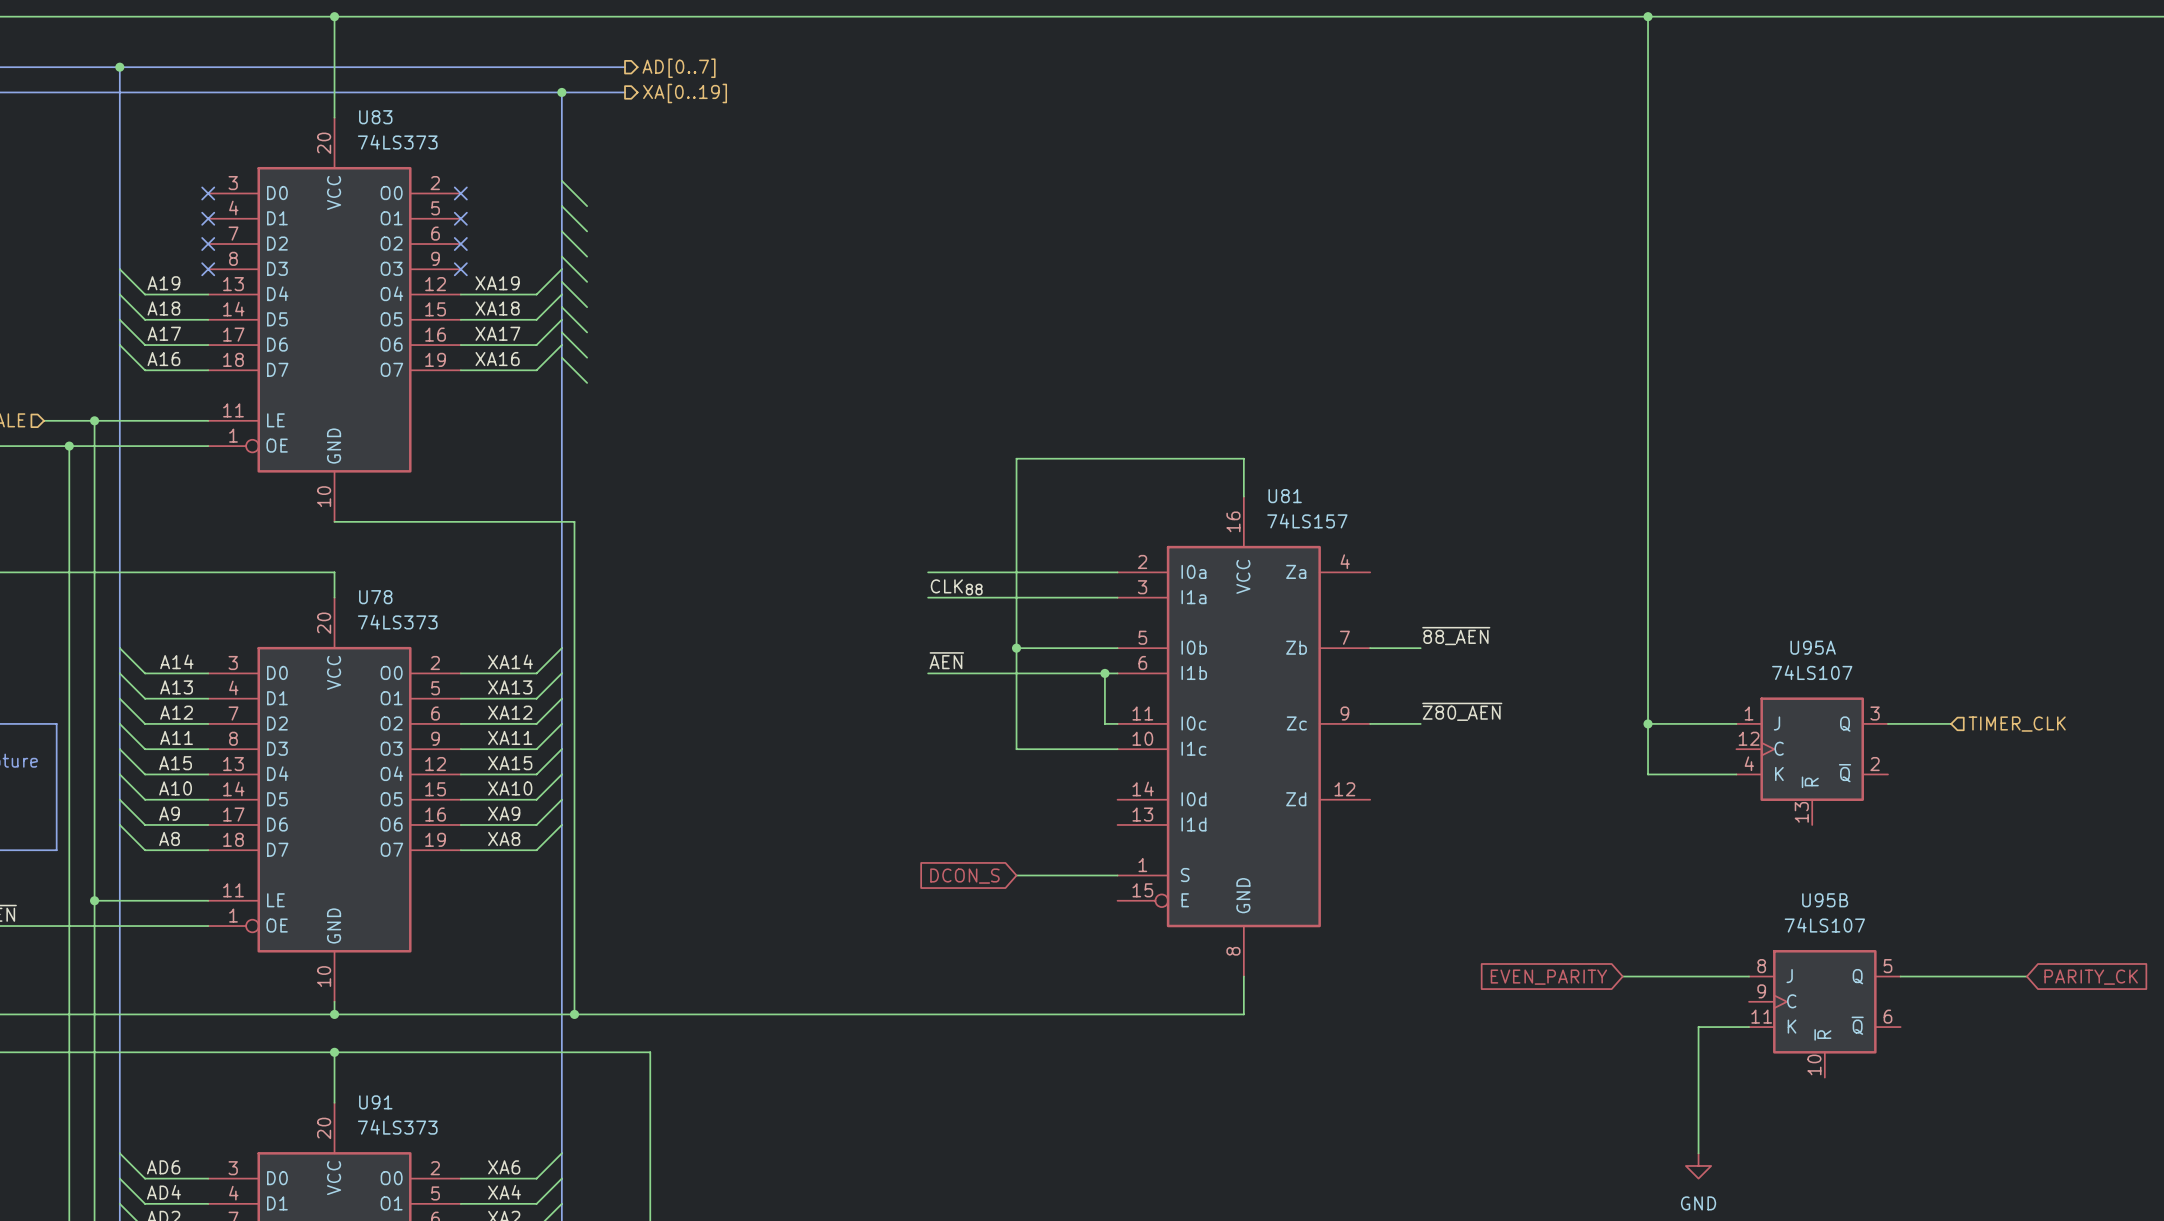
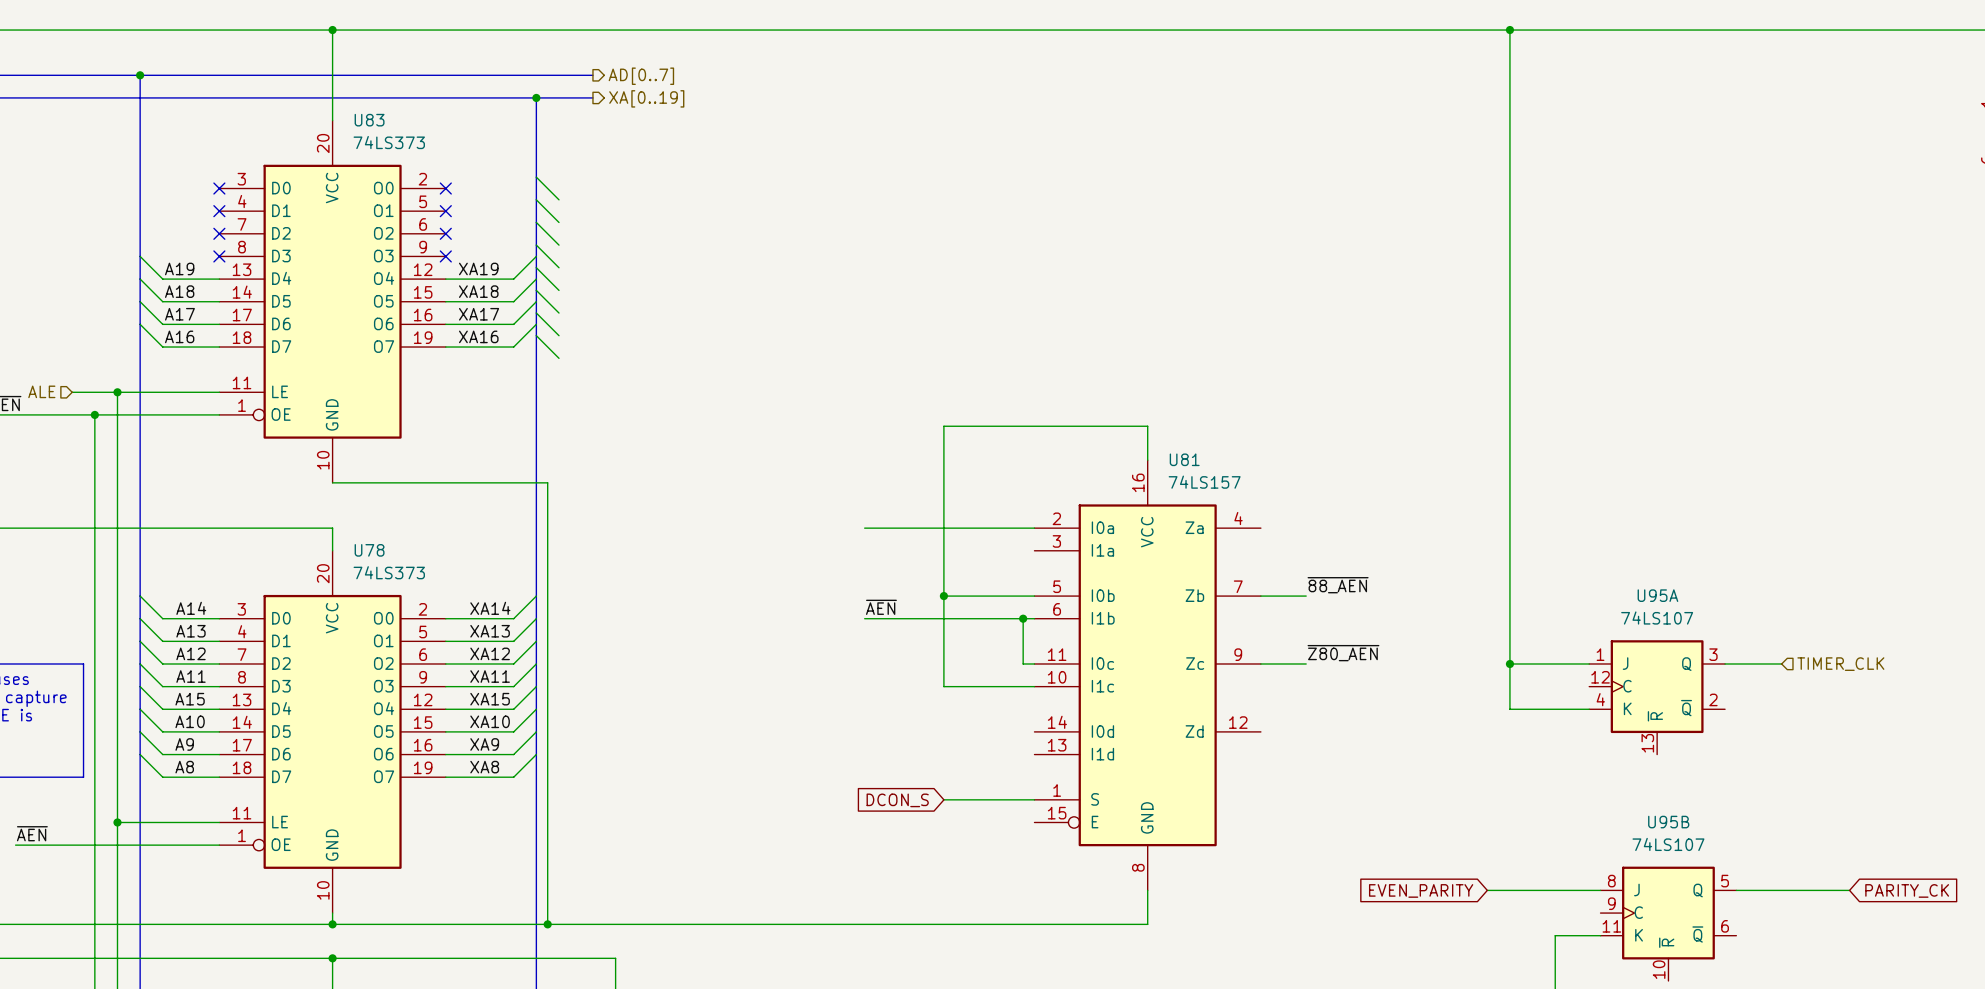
label: CLK88 (956, 587) -> none
wire: (928, 597) (1117, 597) -> none

